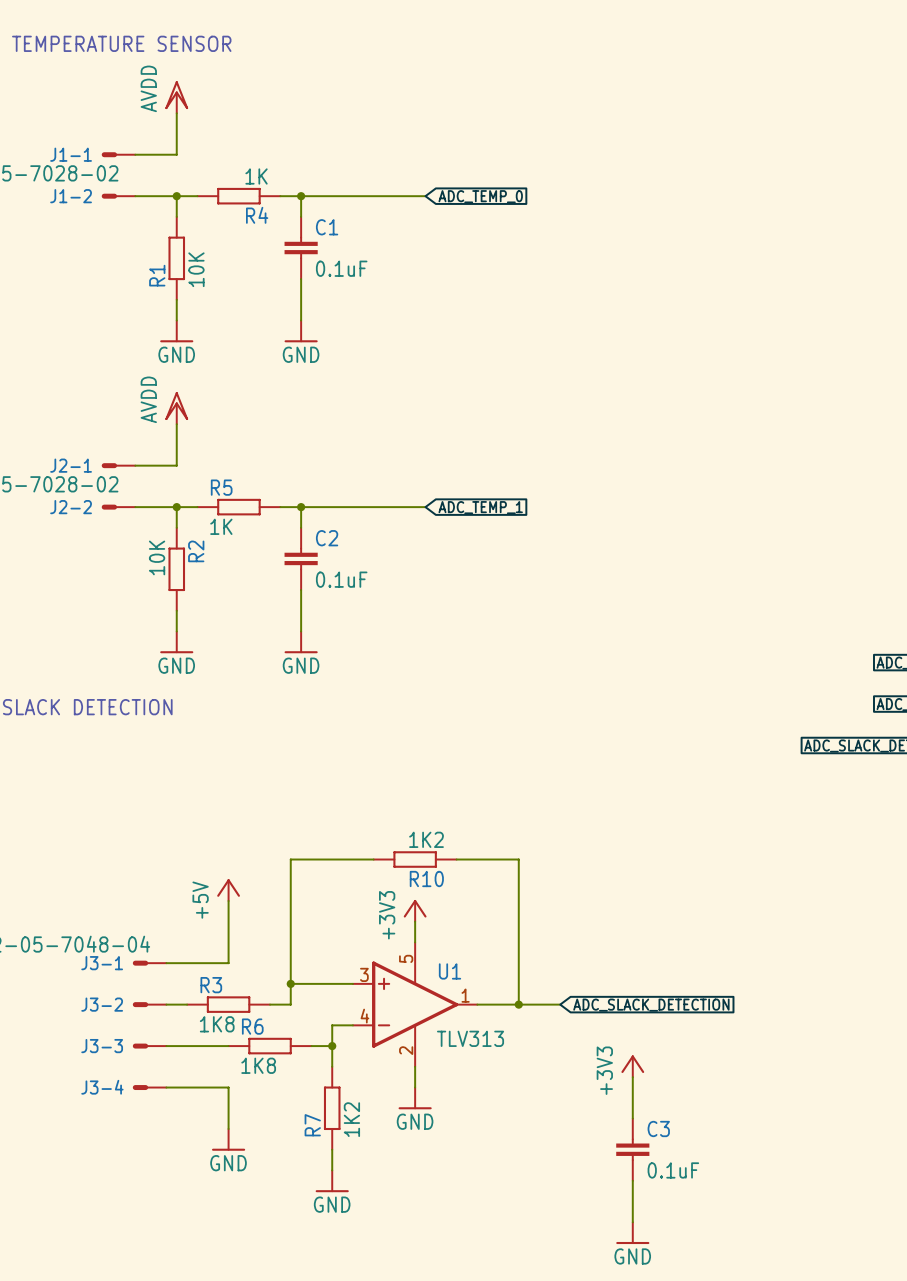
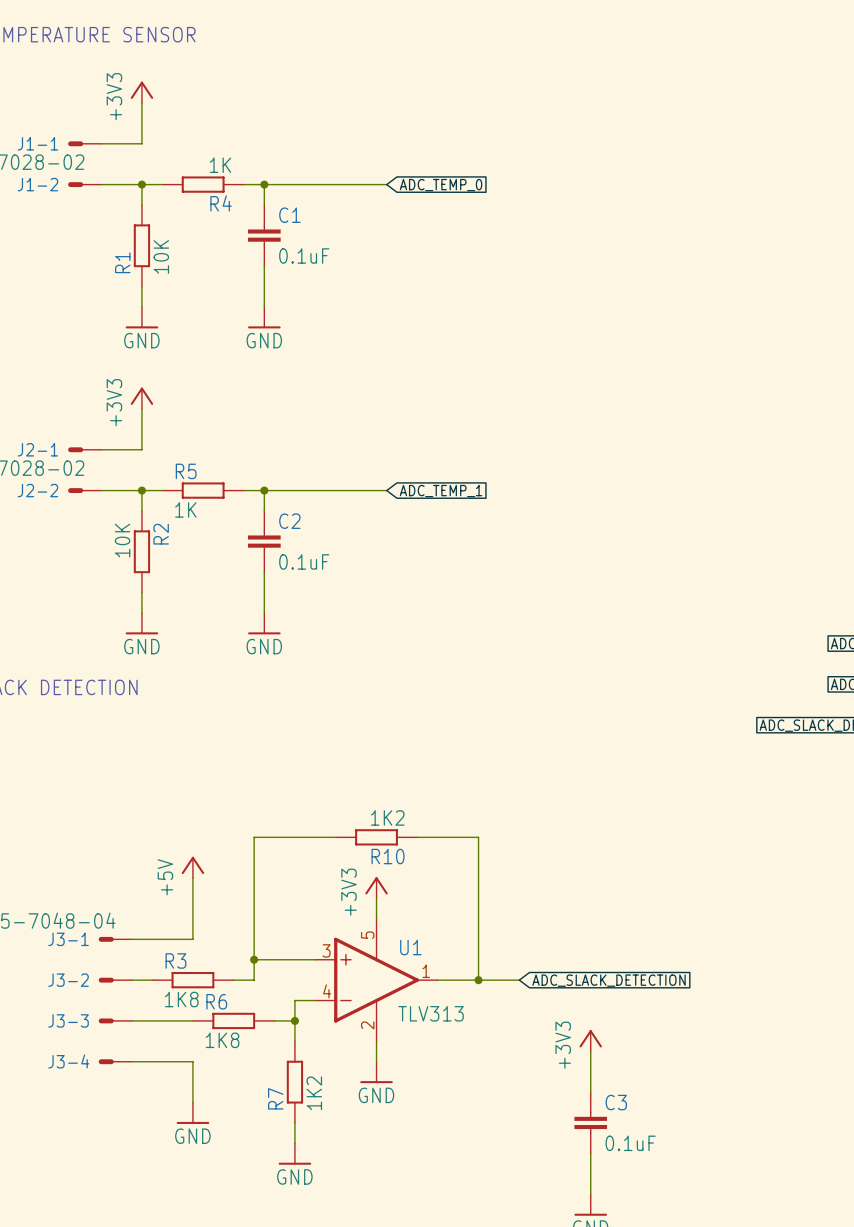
power symbol: AVDD (176, 97) -> +3V3 (141, 92)
power symbol: AVDD (176, 408) -> +3V3 (141, 398)

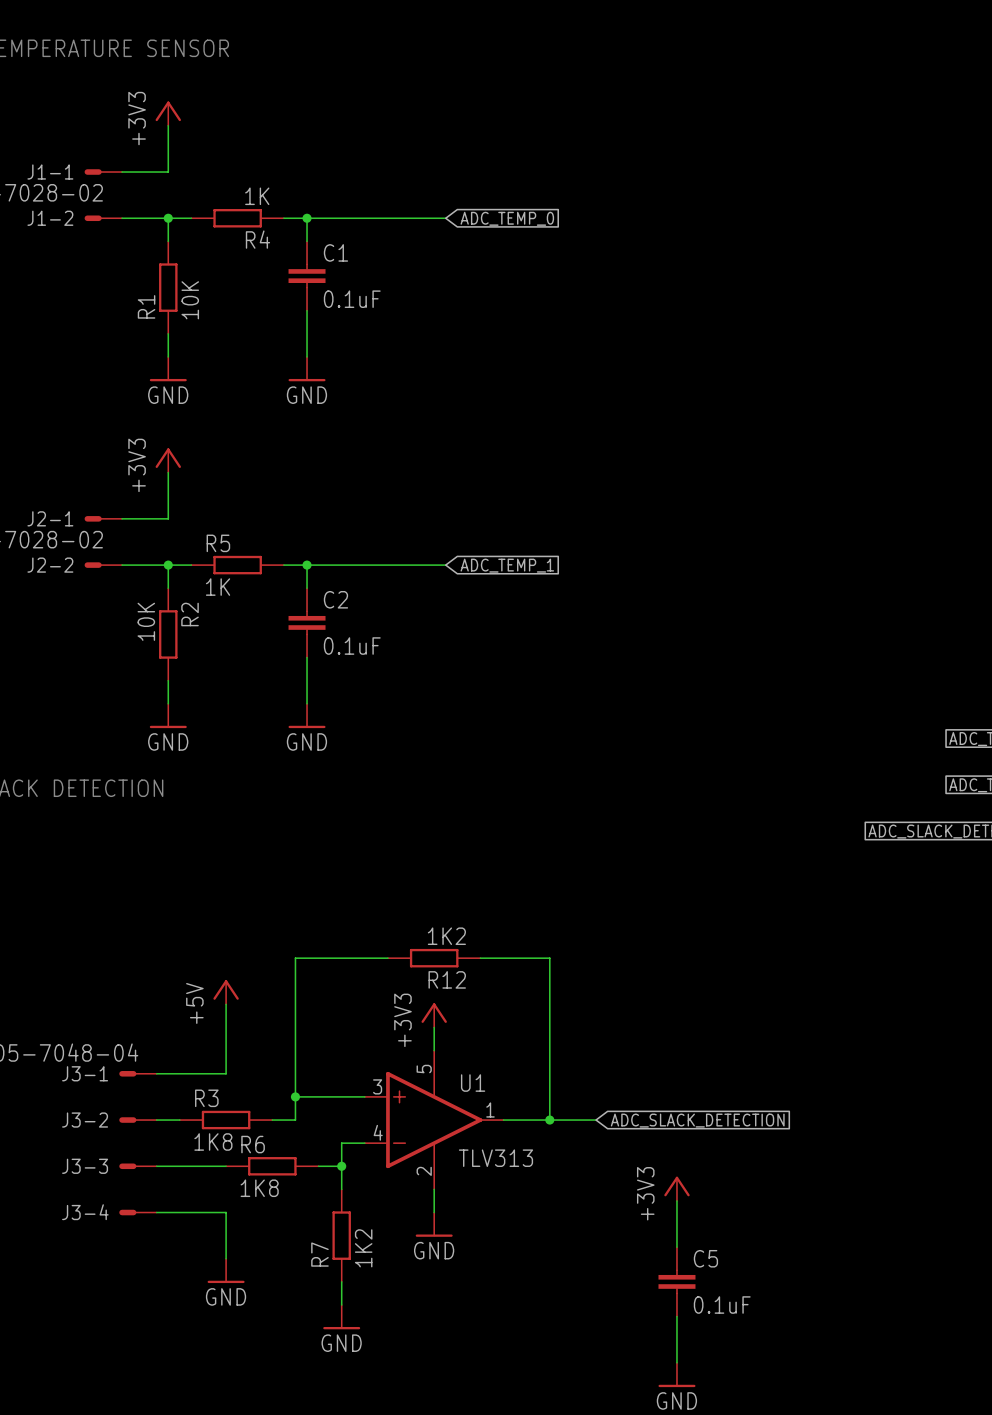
R10 name: R10 (388, 856) -> R12 (447, 979)
C3 name: C3 (616, 1102) -> C5 (705, 1258)

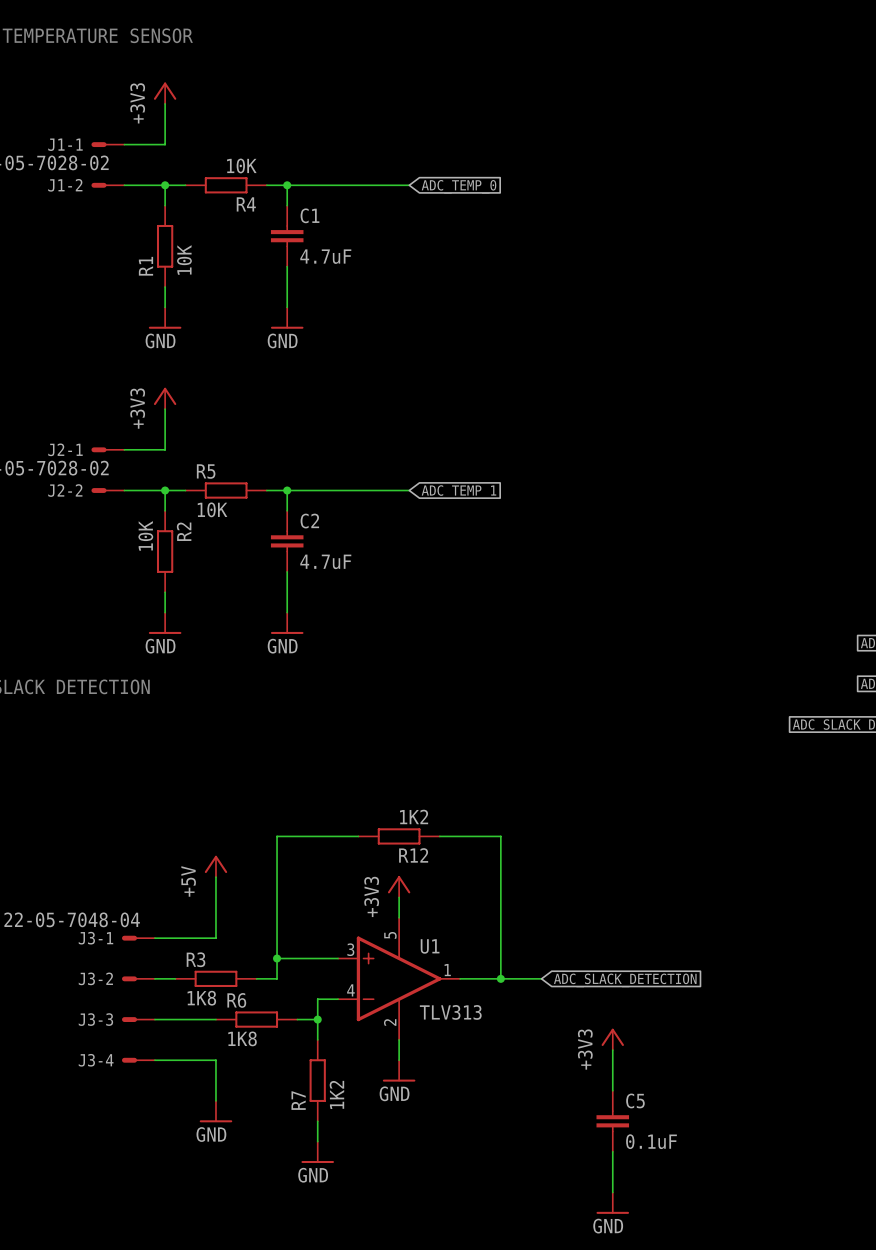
R4 value: 1K (257, 196) -> 10K (241, 165)
C1 value: 0.1uF (352, 299) -> 4.7uF (325, 256)
R5 value: 1K (218, 587) -> 10K (212, 509)
C2 value: 0.1uF (352, 646) -> 4.7uF (325, 561)

